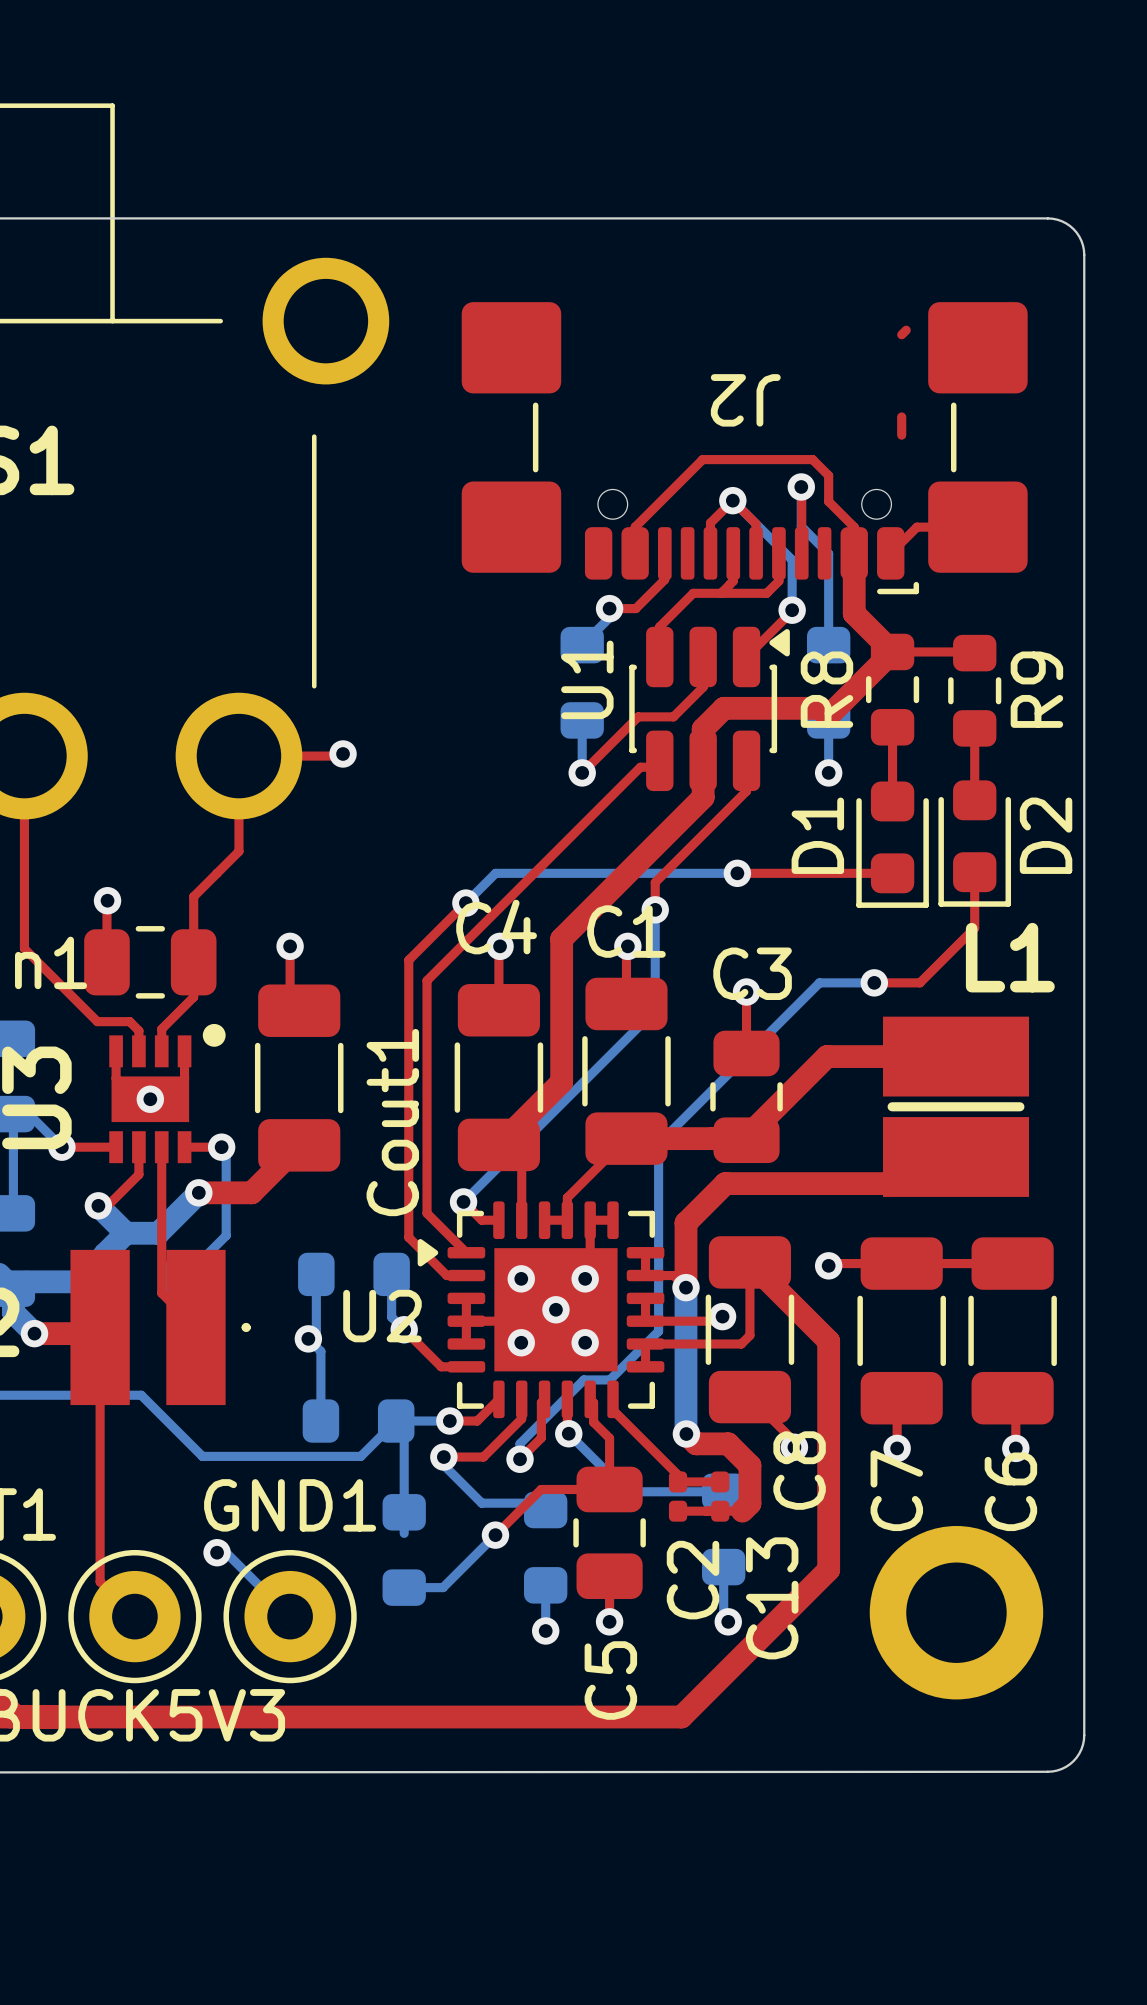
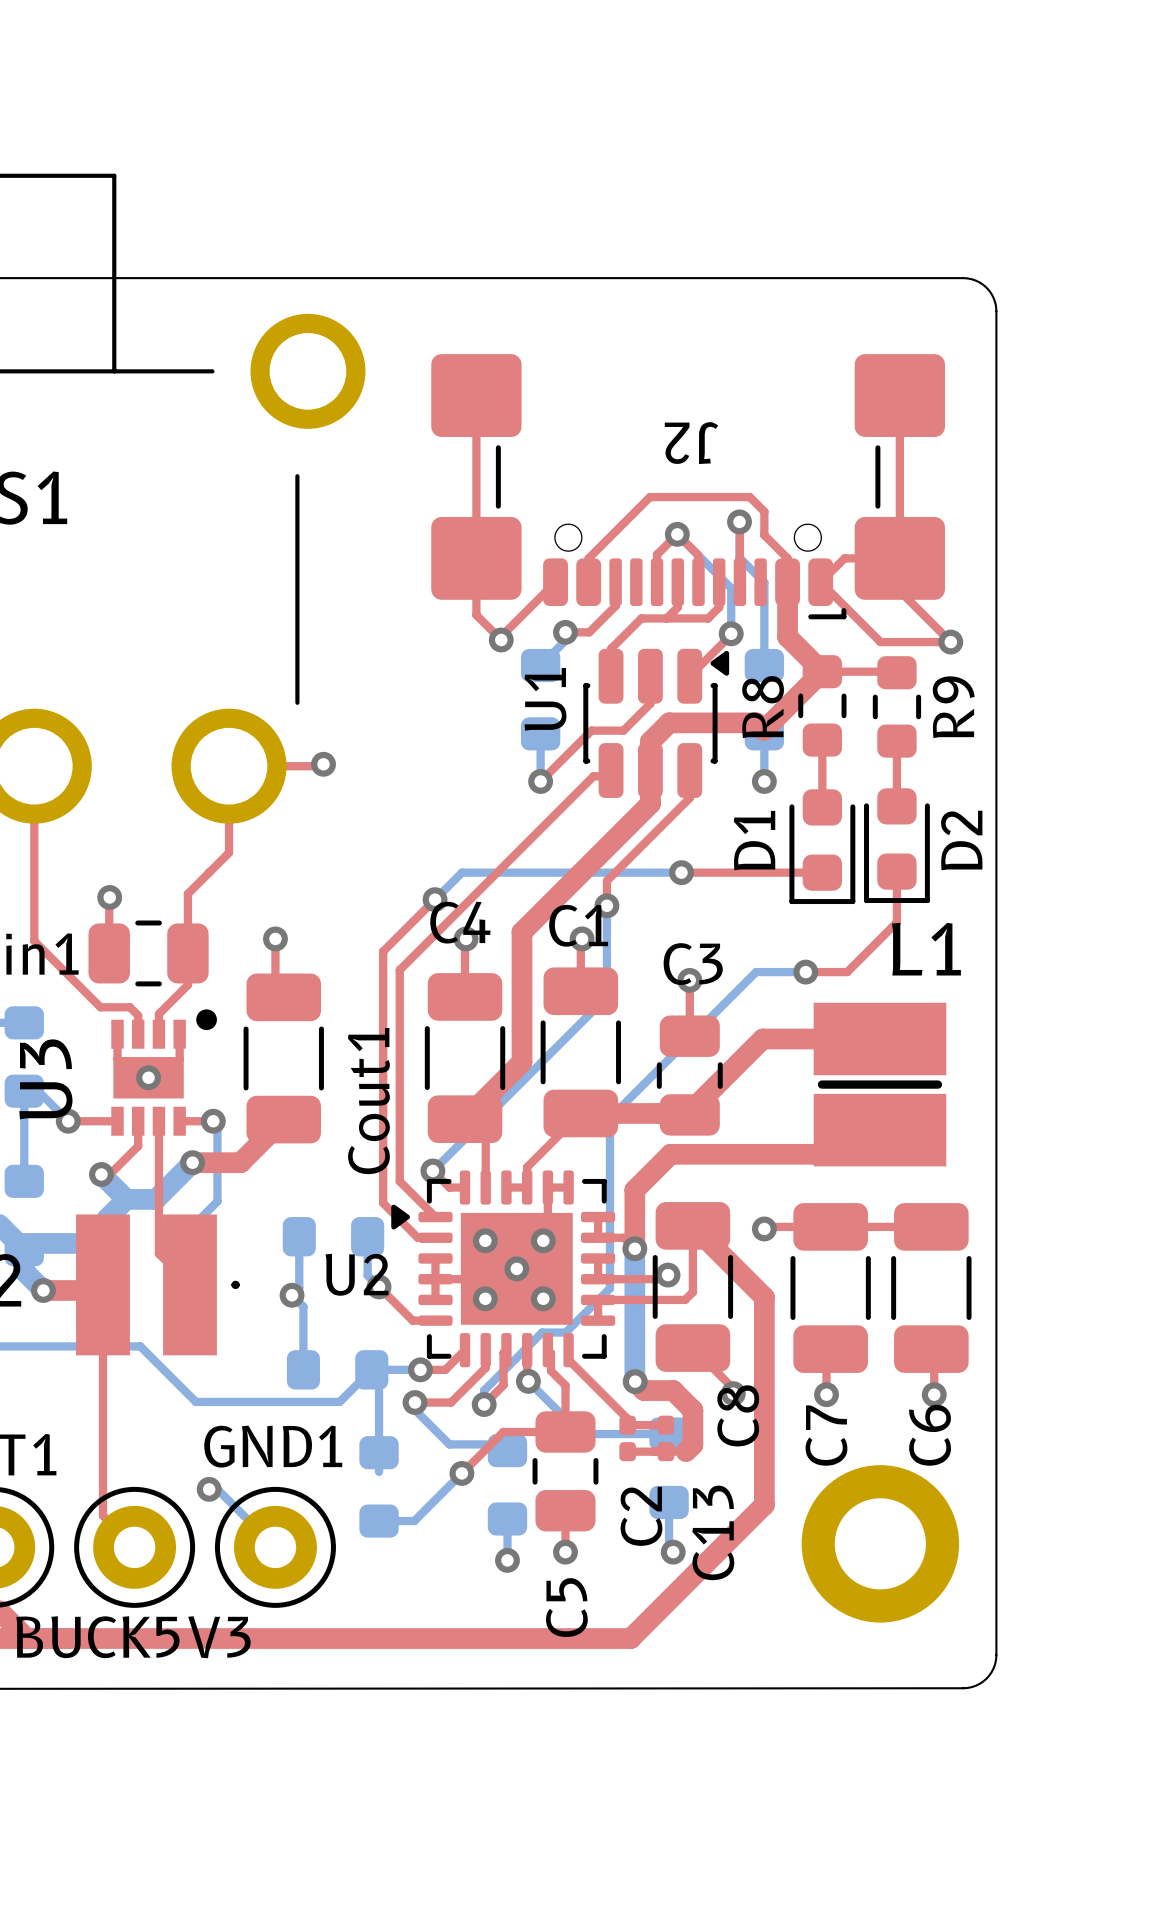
top track: (906, 330) (901, 334) -> none
top track: none -> (476, 395) (476, 615) (501, 640) (501, 636) (555, 582)
top track: none -> (899, 395) (899, 591) (950, 642) (880, 642) (820, 582)
top track: (901, 416) (901, 435) -> none
via: none -> (501, 640)
via: none -> (950, 642)

